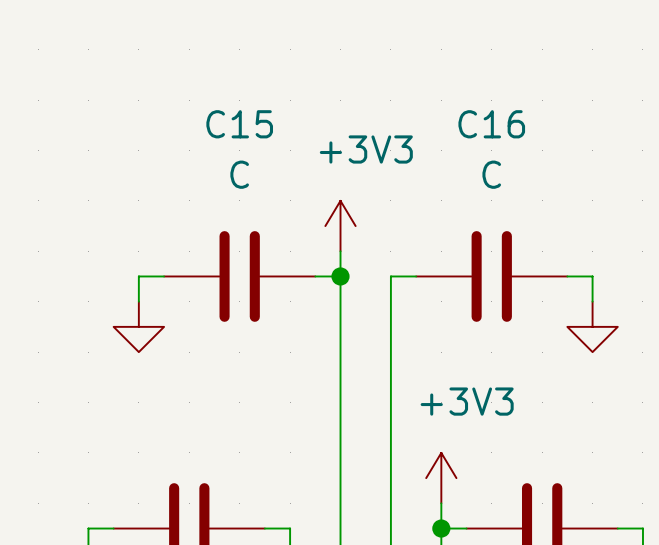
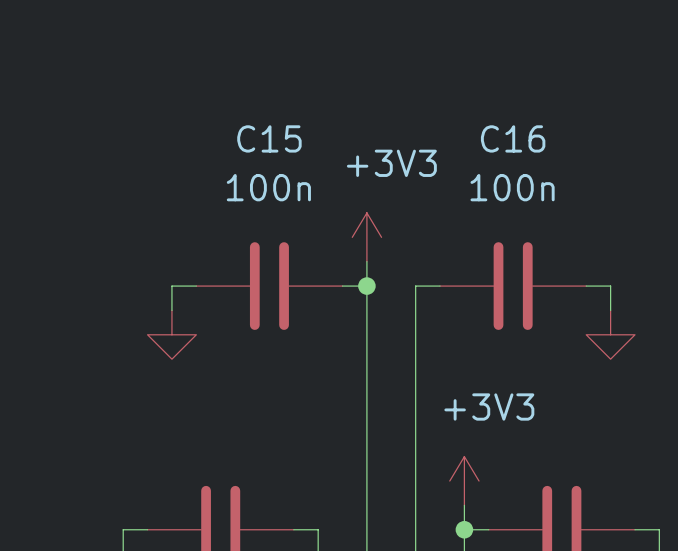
C15 value: C (239, 174) -> 100n (268, 187)
C16 value: C (491, 174) -> 100n (512, 187)

